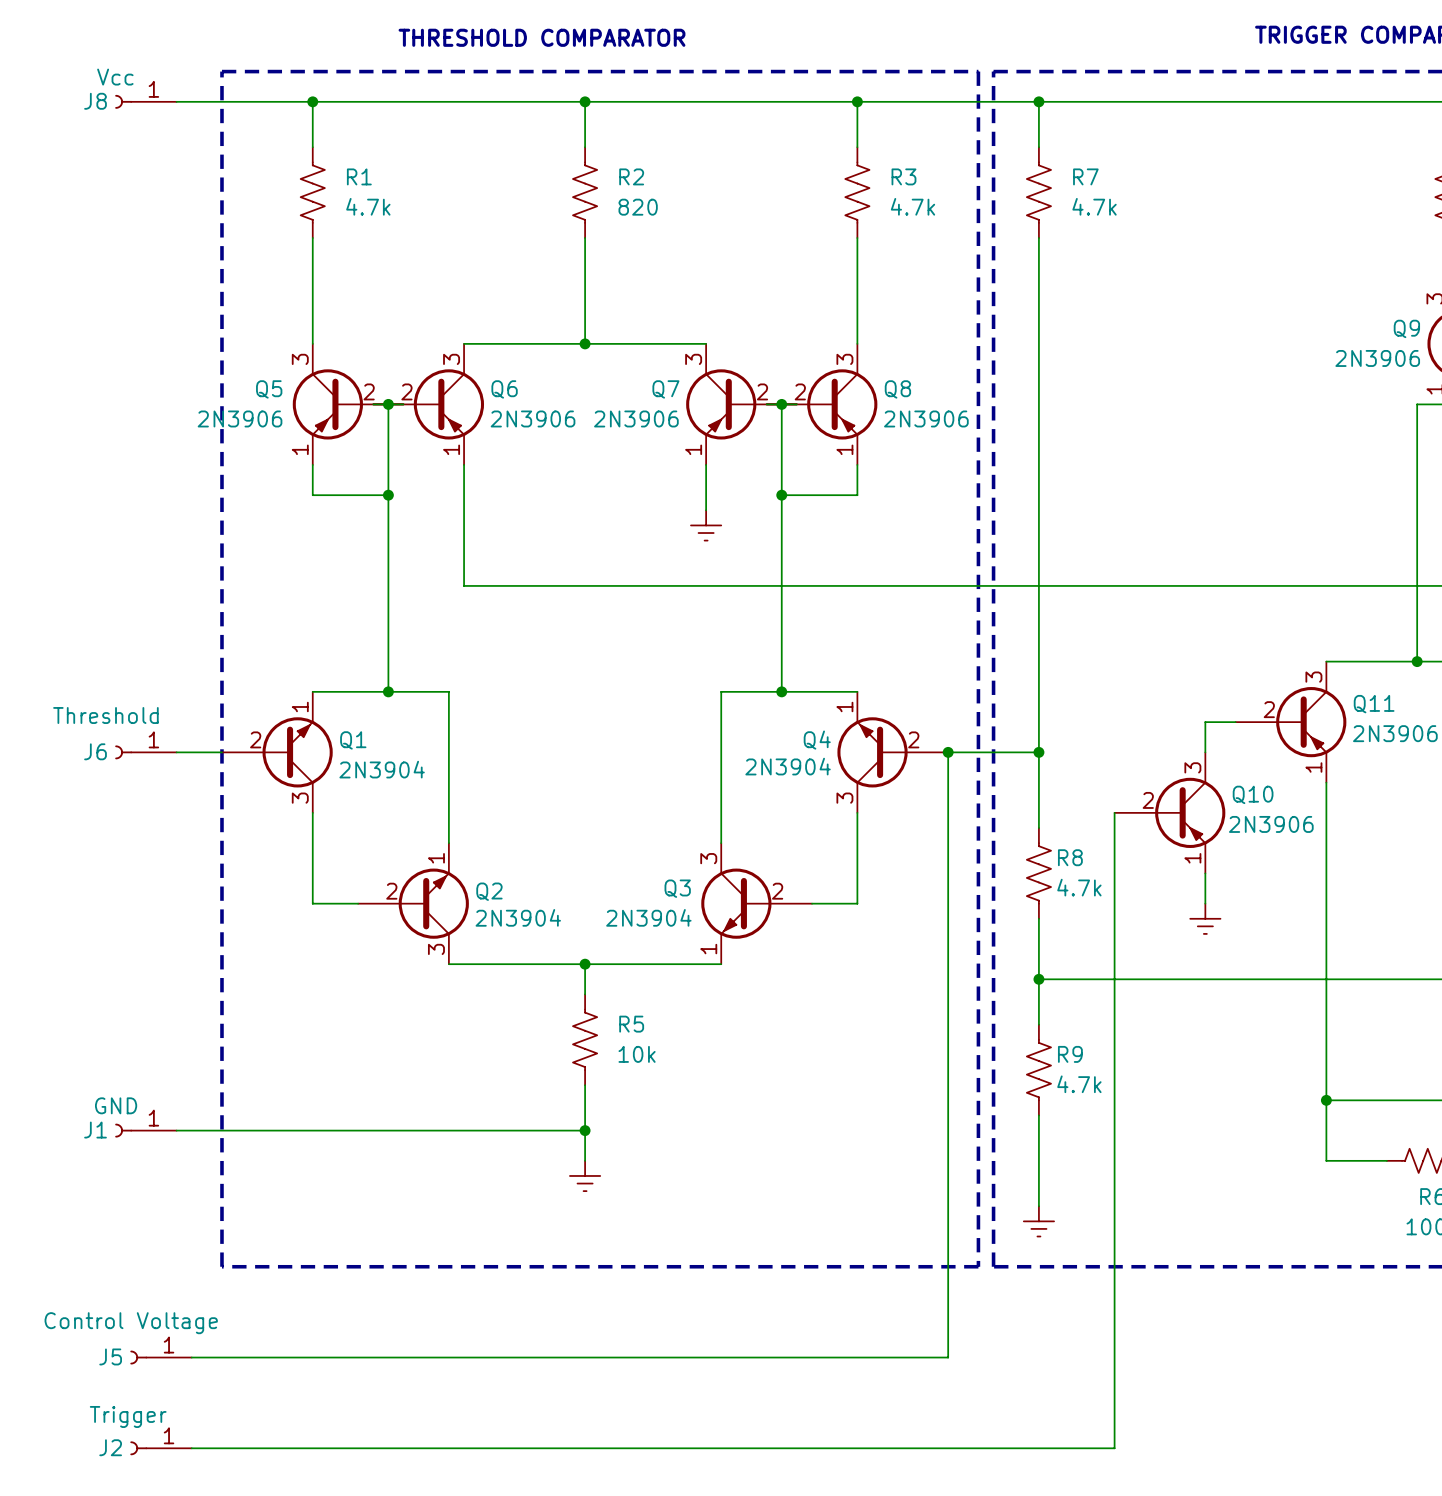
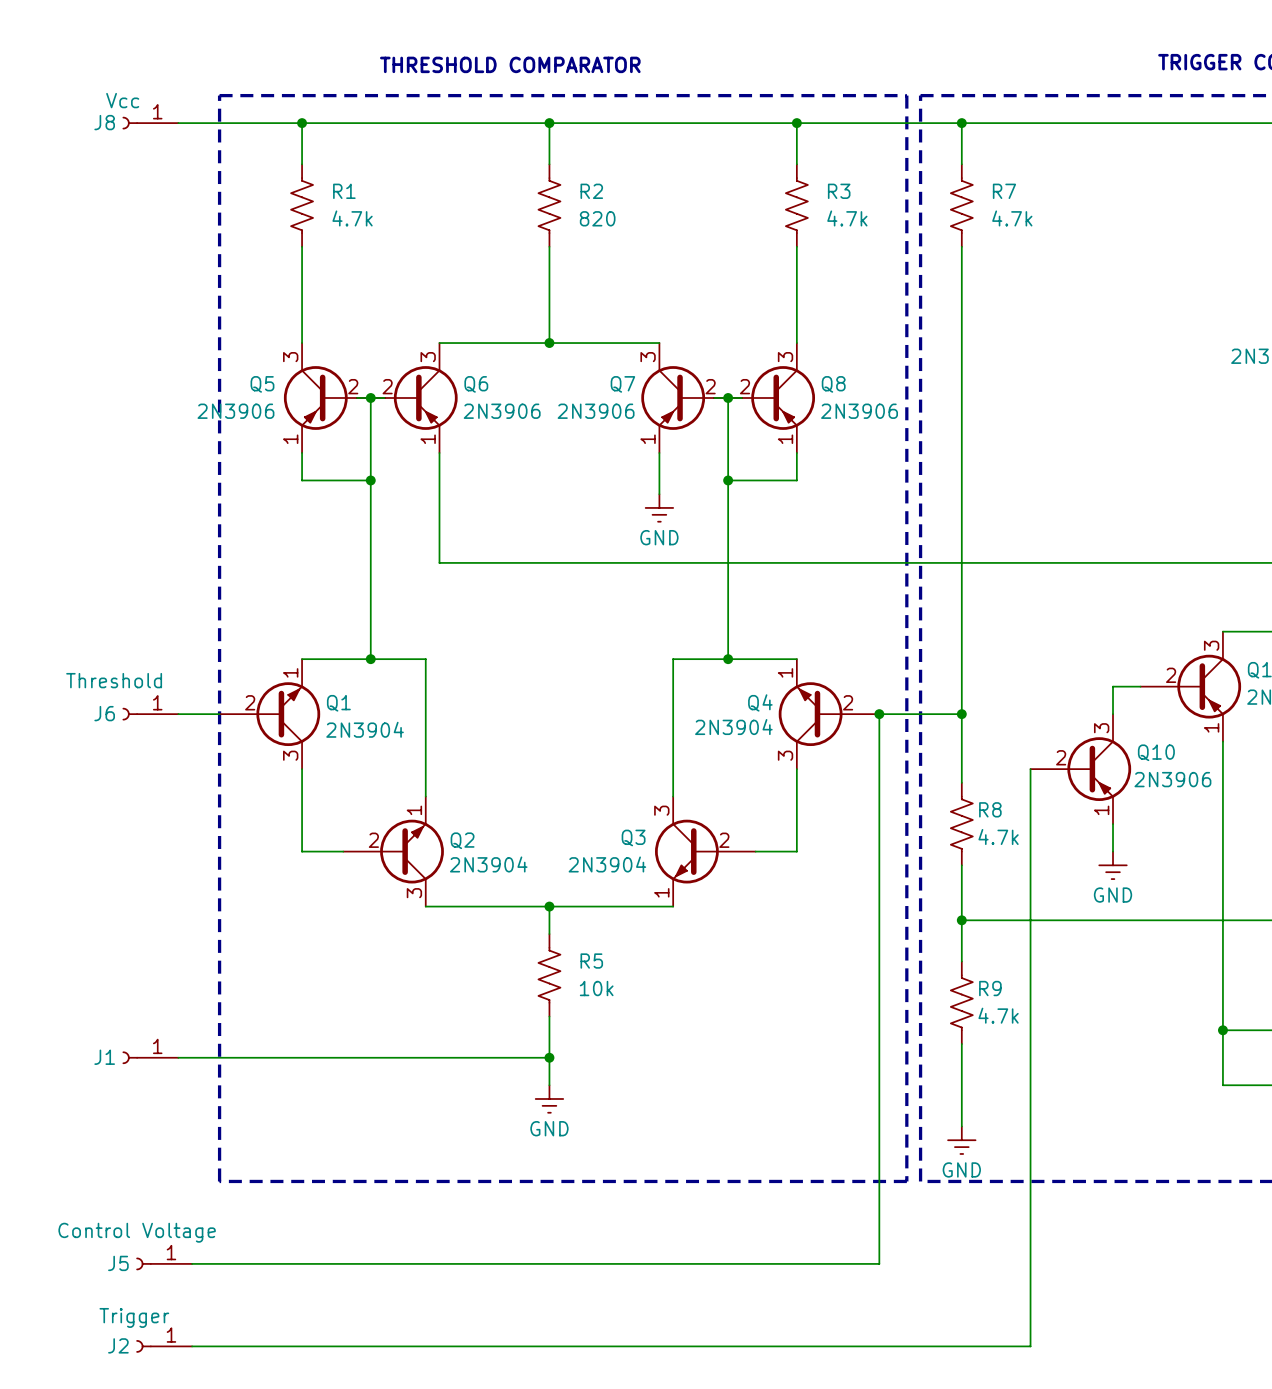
power symbol text: none -> GND (659, 537)
power symbol text: none -> GND (1113, 895)
J1 value: GND (116, 1105) -> none
power symbol text: none -> GND (549, 1128)
power symbol text: none -> GND (961, 1169)

